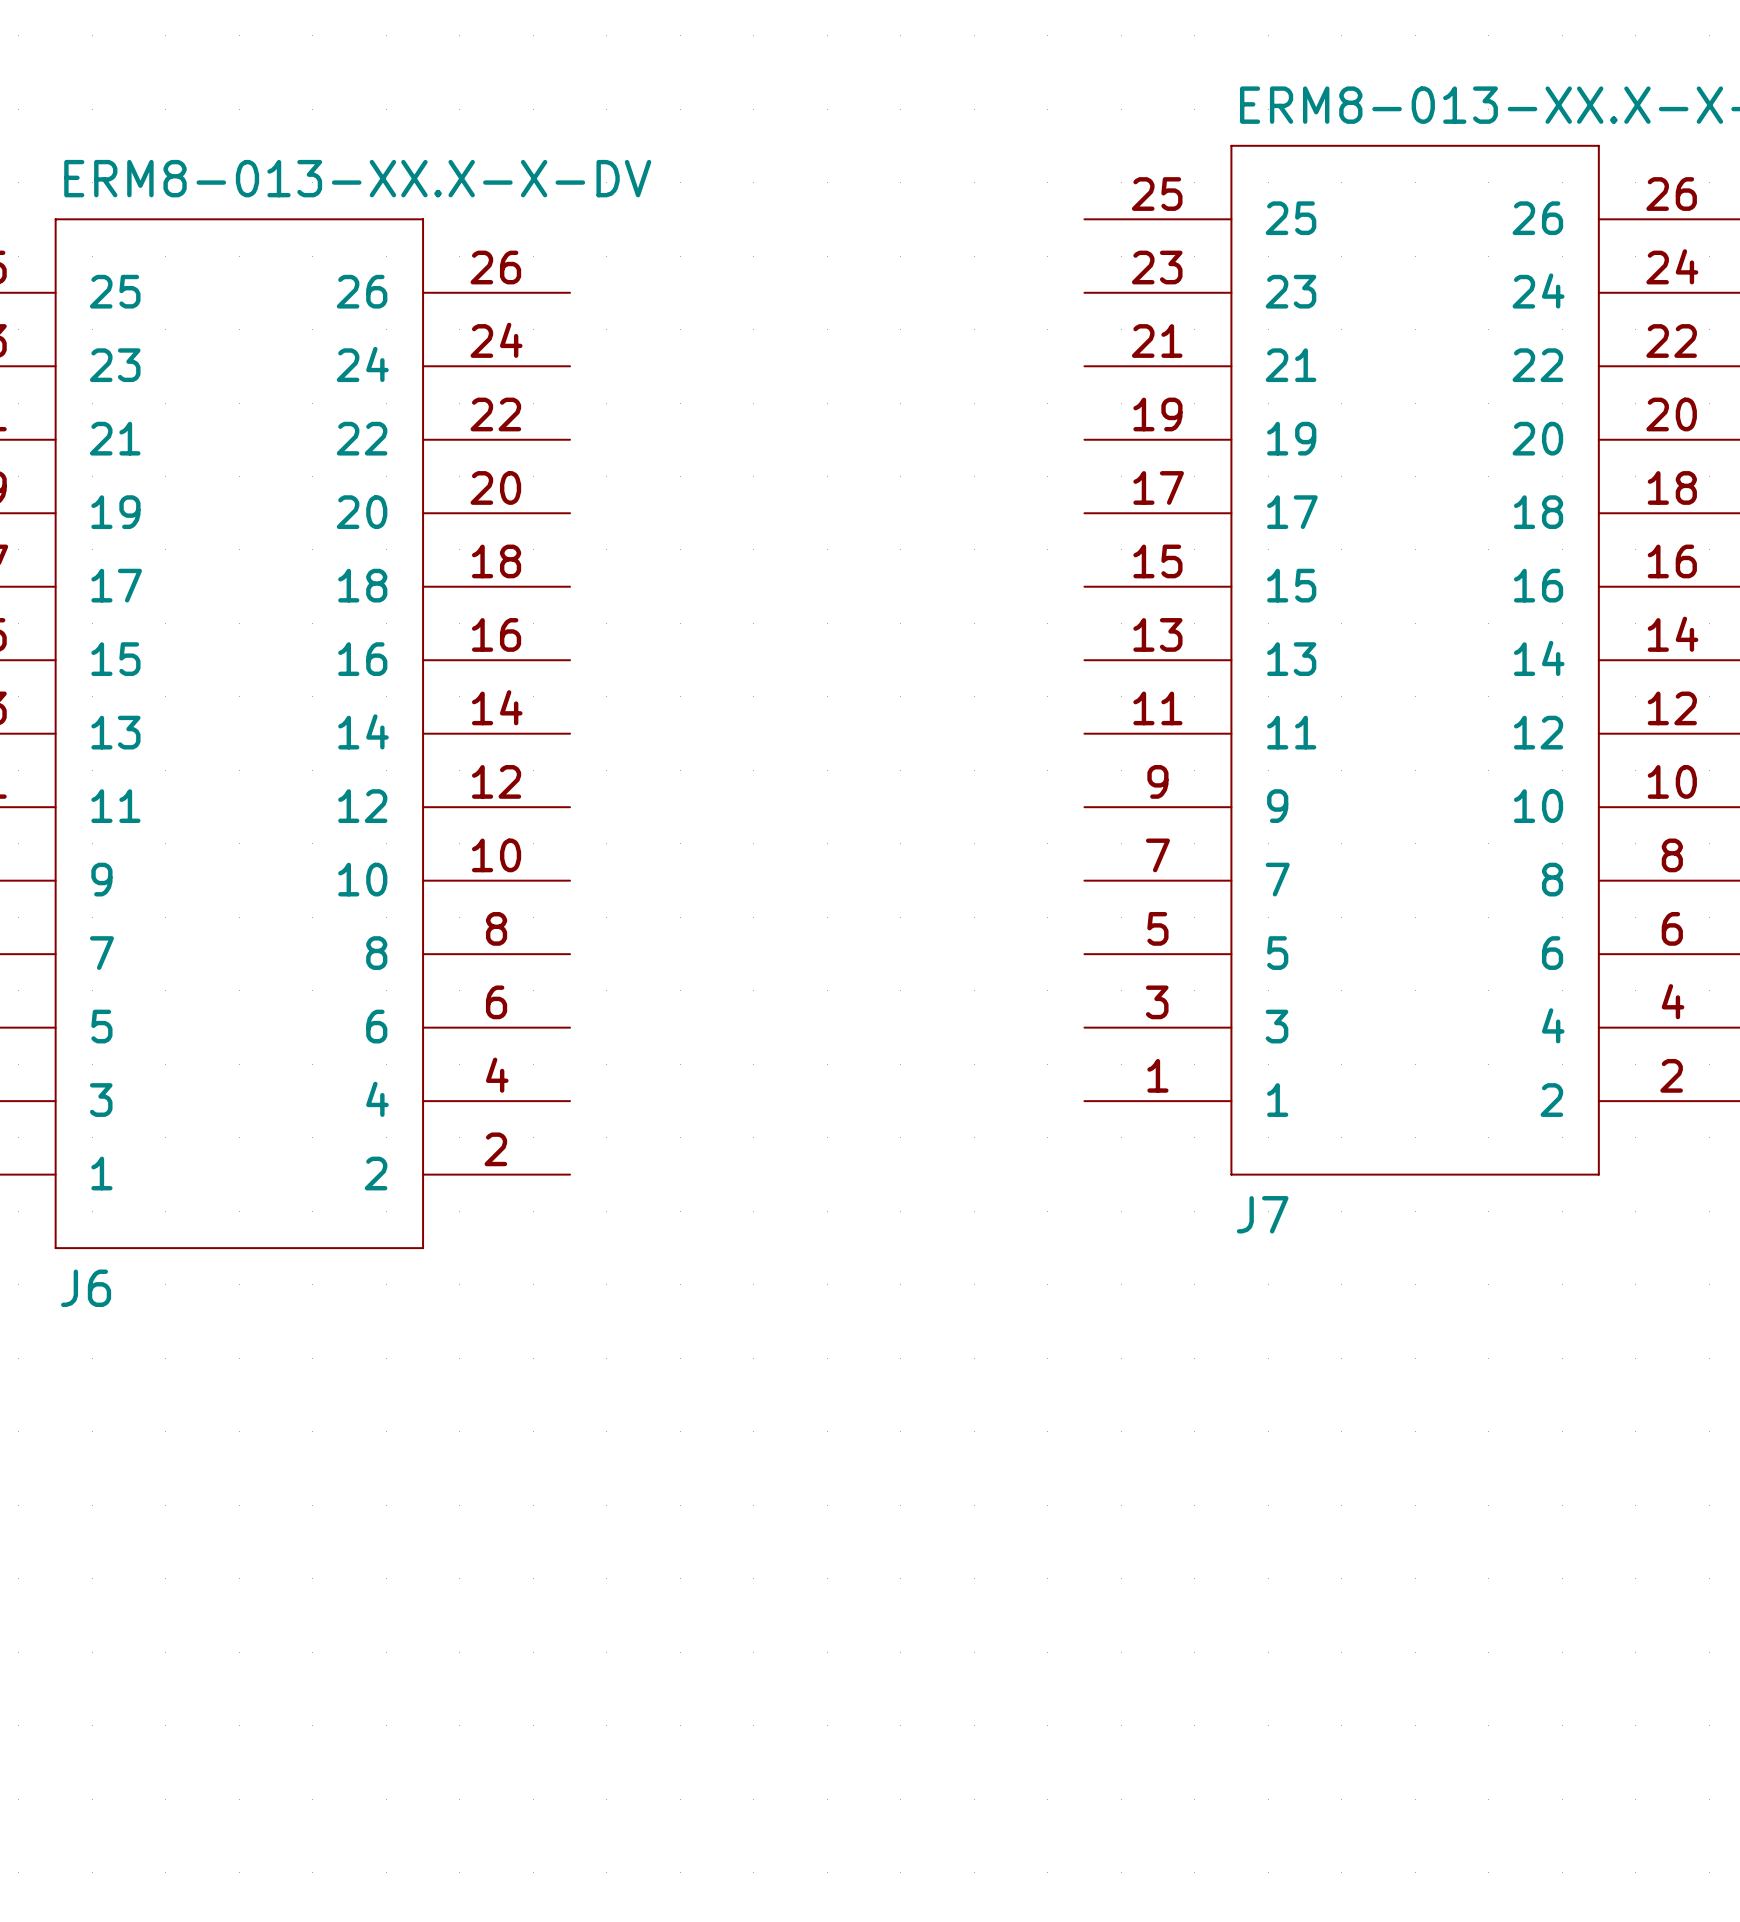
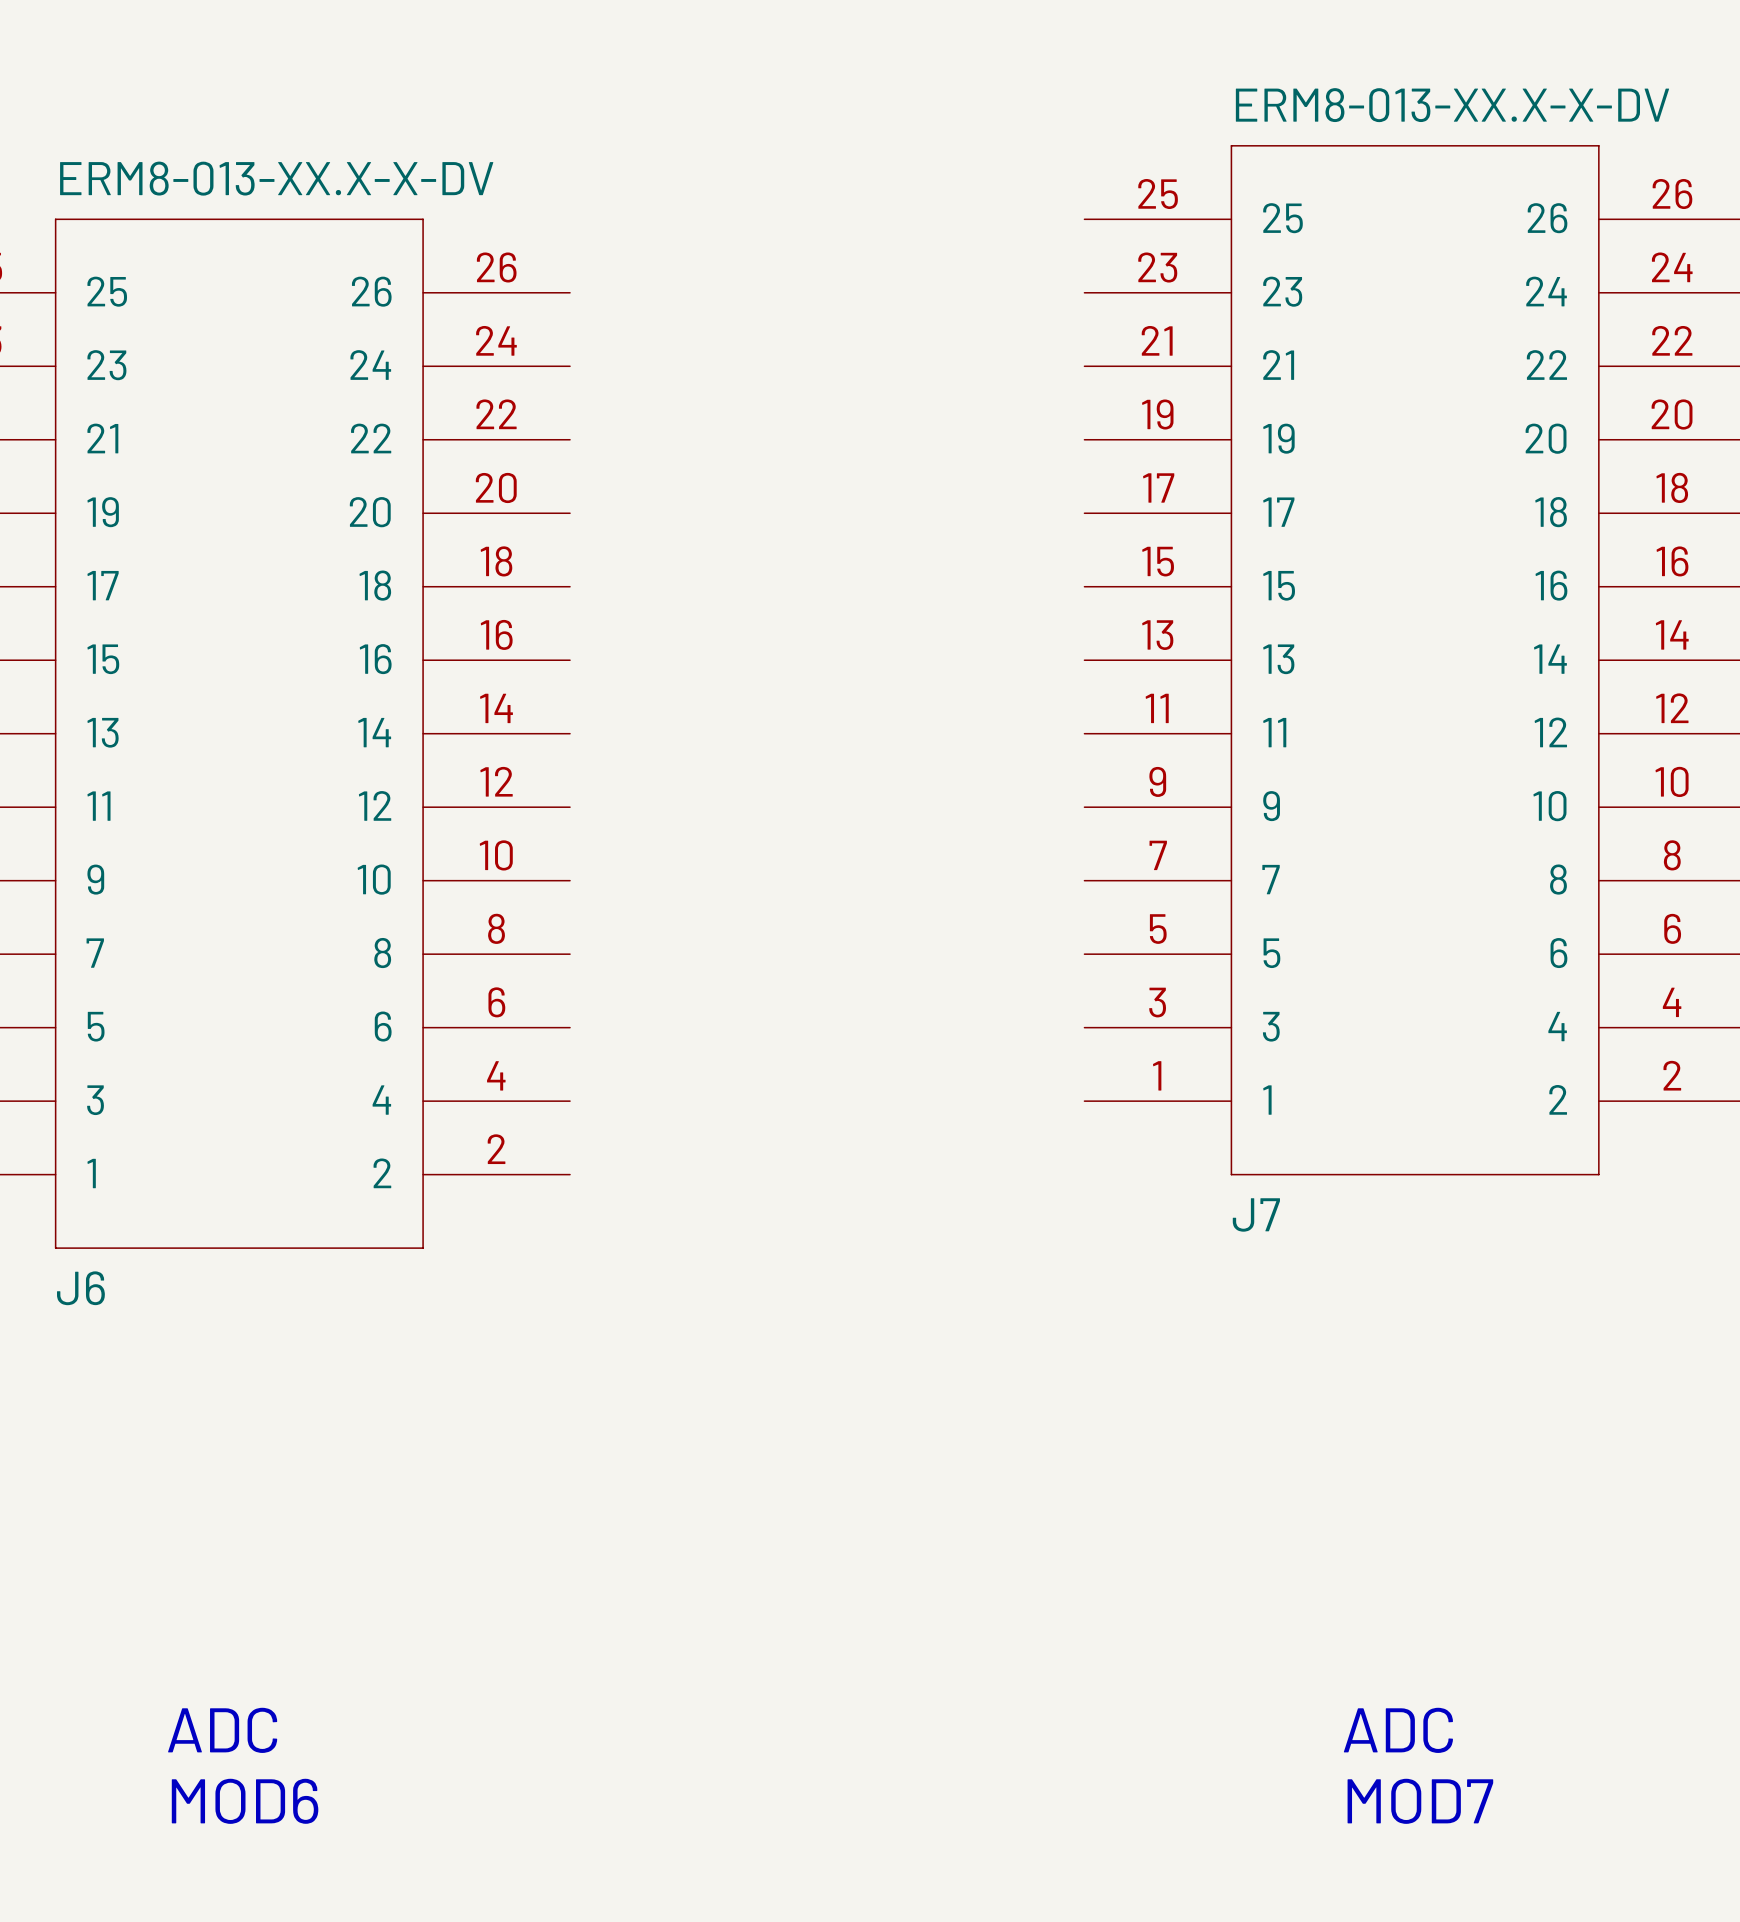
text: none -> ADC (222, 1730)
text: none -> ADC (1398, 1730)
text: none -> MOD6 (245, 1801)
text: none -> MOD7 (1420, 1801)

